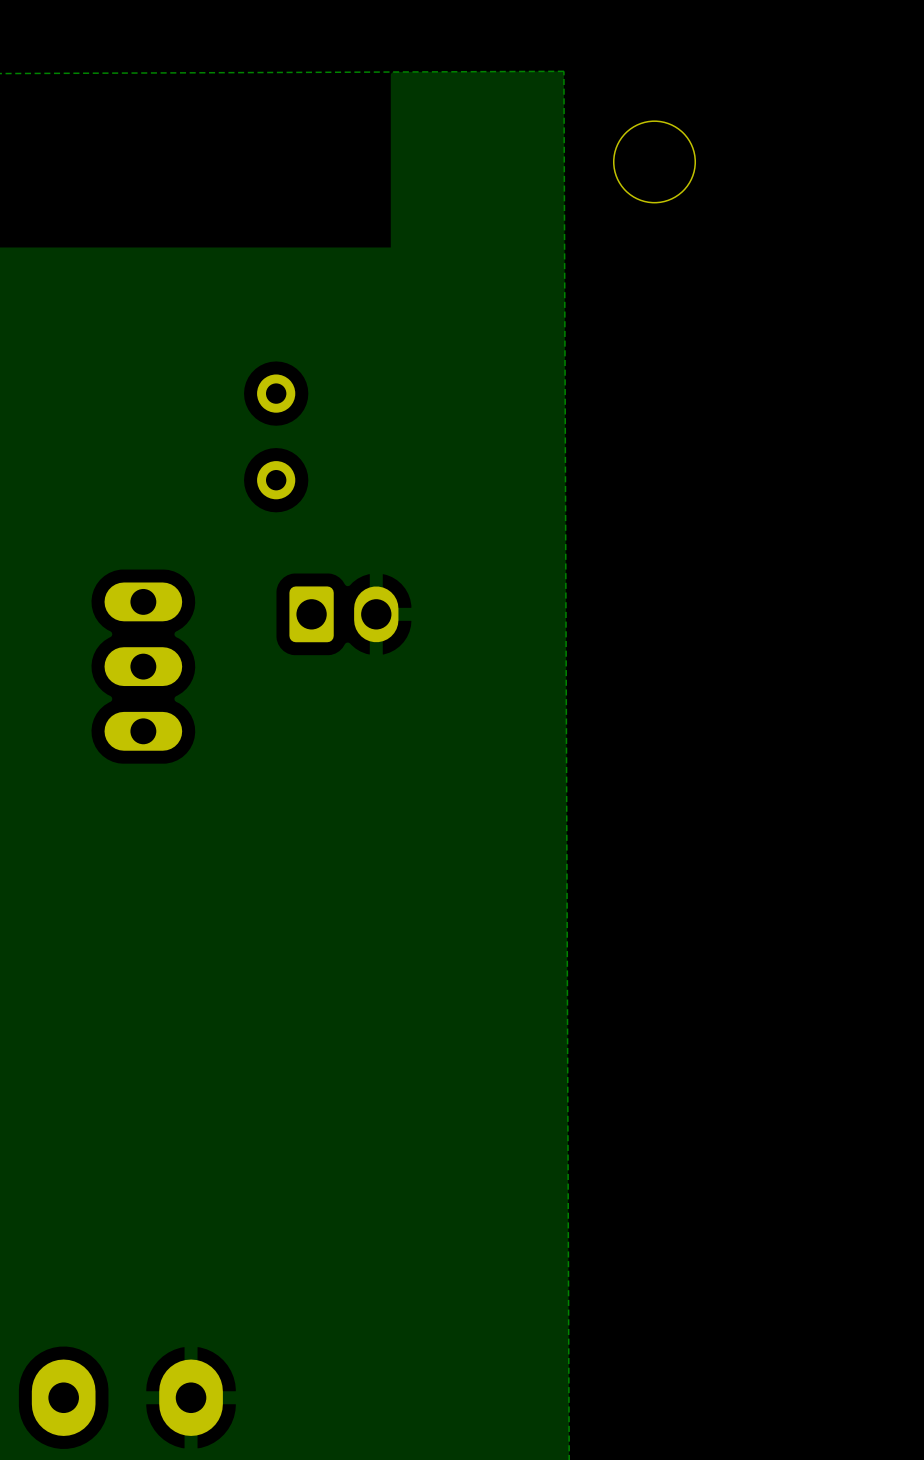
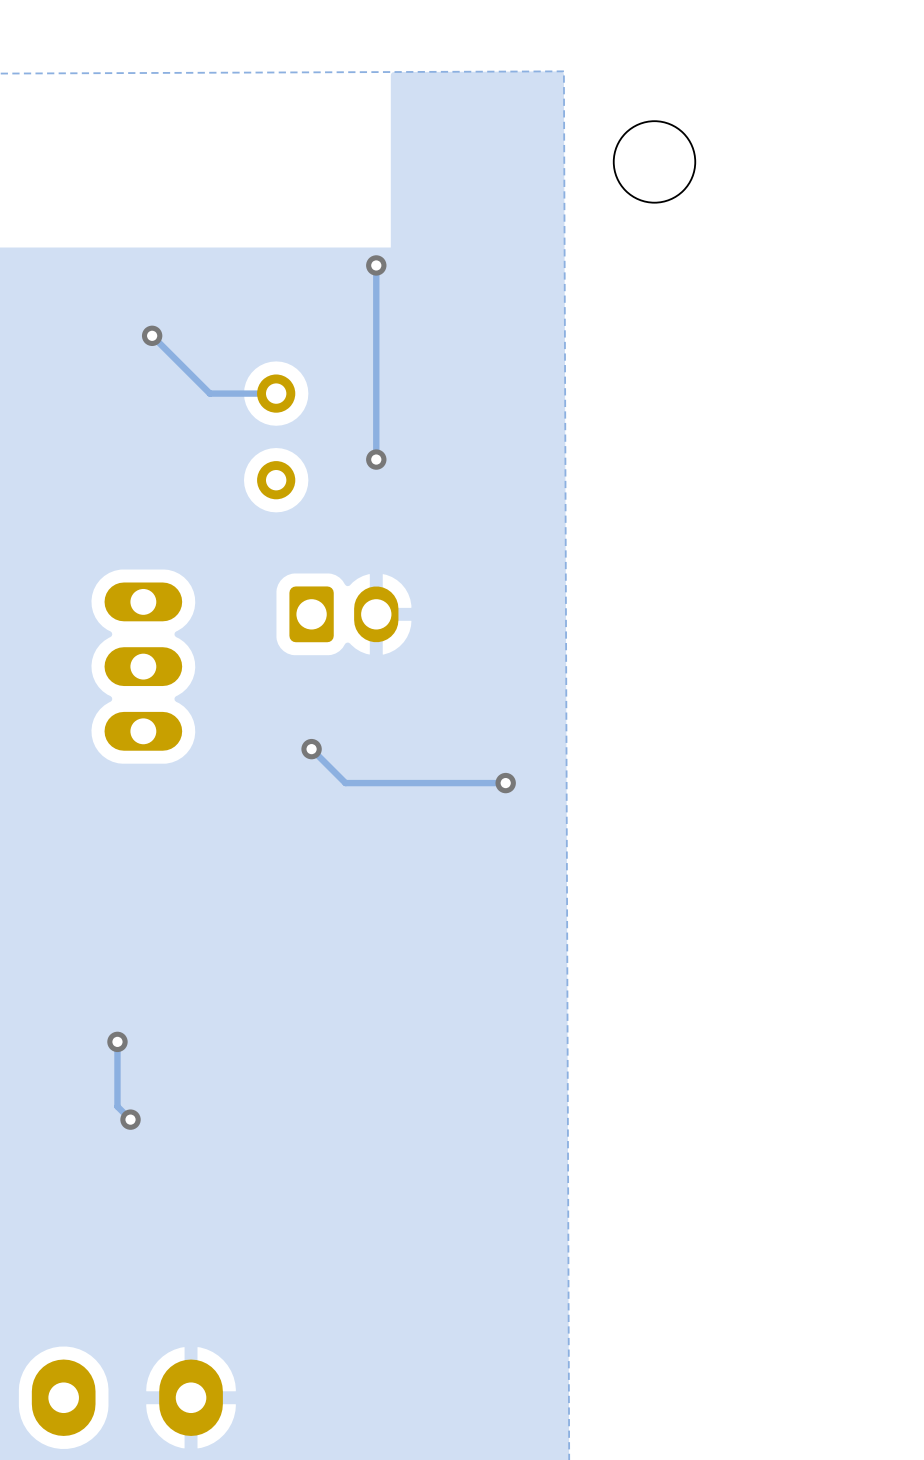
track: none -> (376, 265) (376, 459)
via: none -> (376, 265)
track: none -> (152, 335) (209, 393) (276, 393)
via: none -> (152, 335)
via: none -> (376, 459)
track: none -> (311, 749) (345, 783) (505, 783)
via: none -> (311, 749)
via: none -> (505, 783)
track: none -> (117, 1041) (117, 1106) (130, 1119)
via: none -> (117, 1041)
via: none -> (130, 1119)

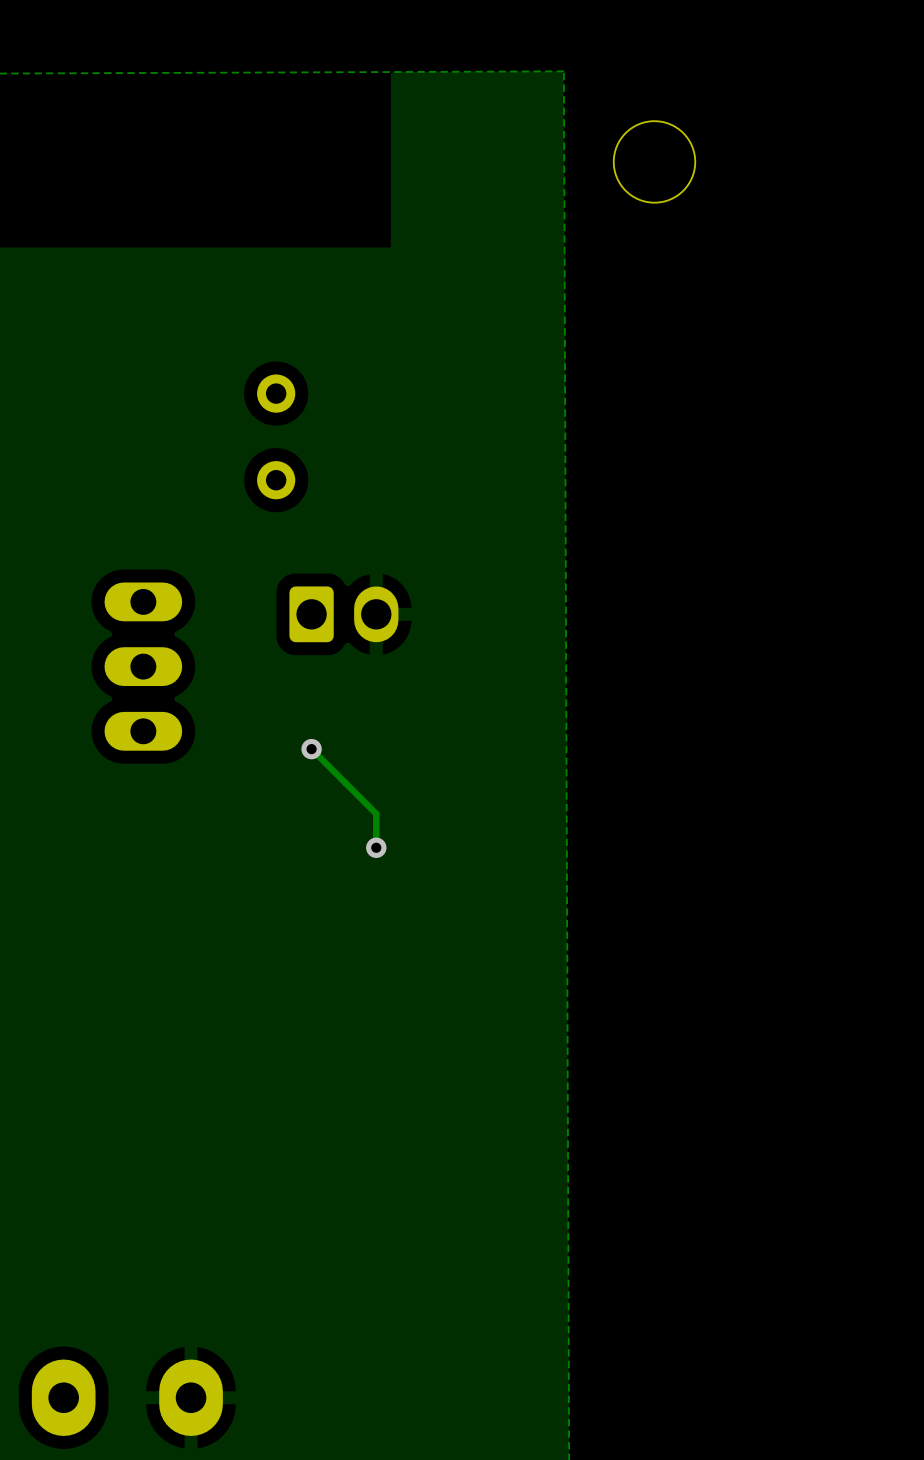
track: (376, 265) (376, 459) -> none
via: (376, 265) -> none
track: (152, 335) (209, 393) (276, 393) -> none
via: (152, 335) -> none
via: (376, 459) -> none
track: (505, 783) (345, 783) -> (376, 847) (376, 813) (345, 783)
via position: (505, 783) -> (376, 847)
track: (117, 1041) (117, 1106) (130, 1119) -> none
via: (117, 1041) -> none
via: (130, 1119) -> none

